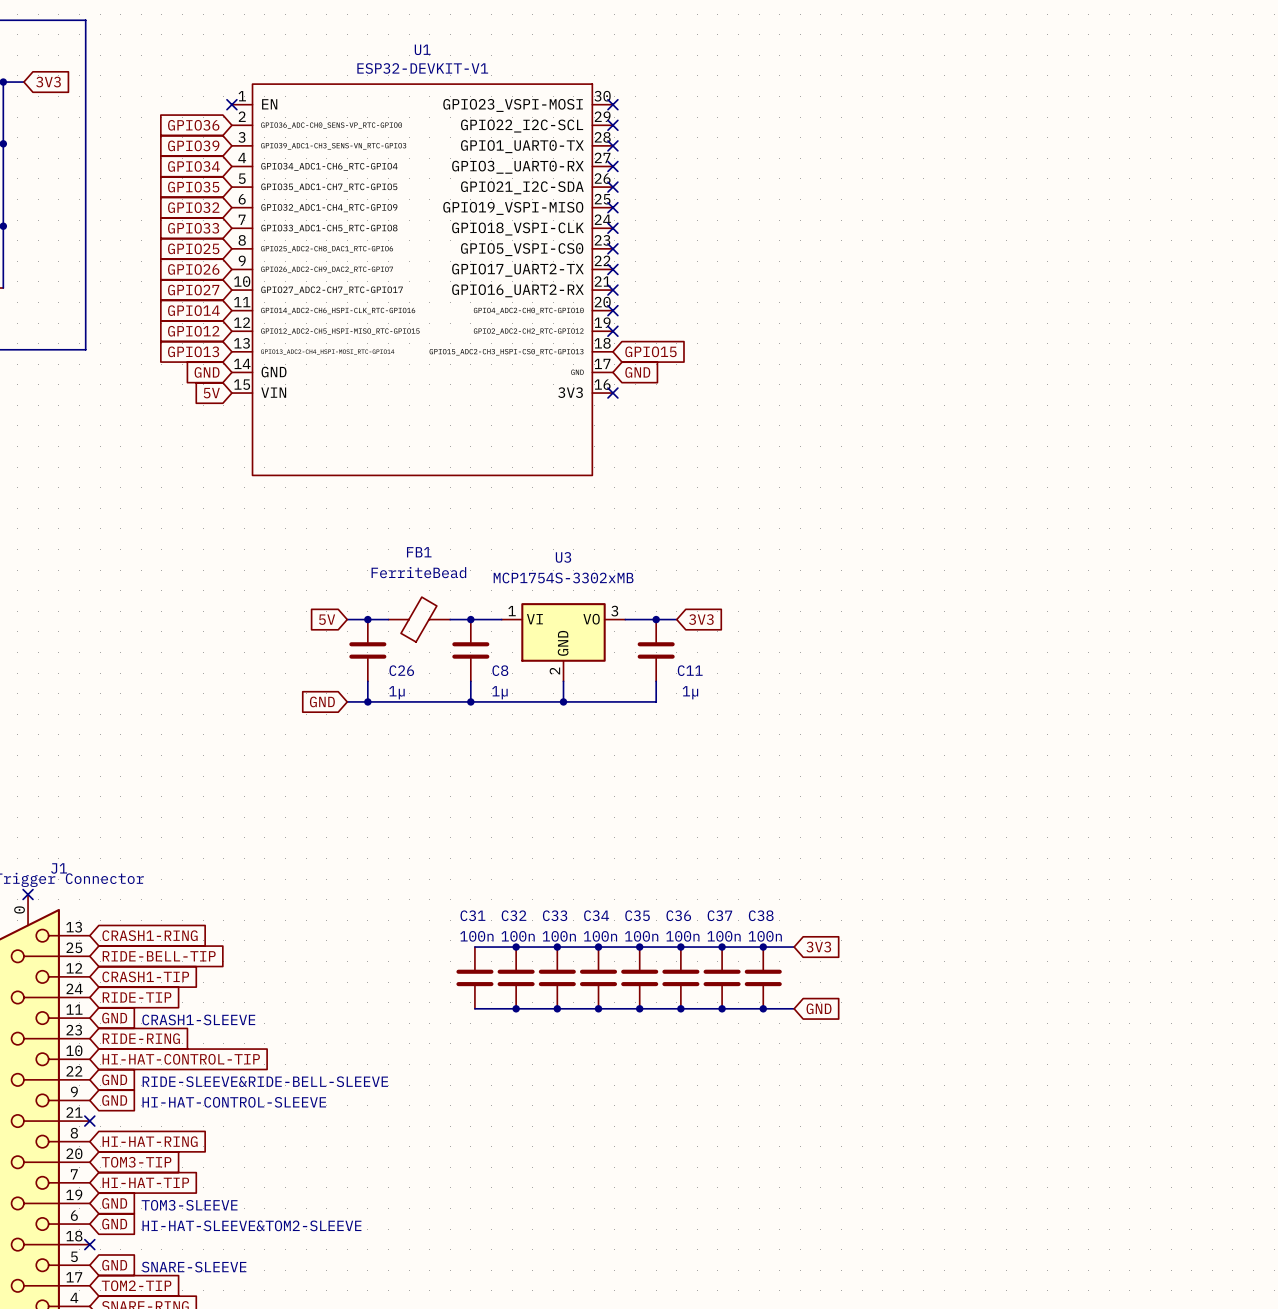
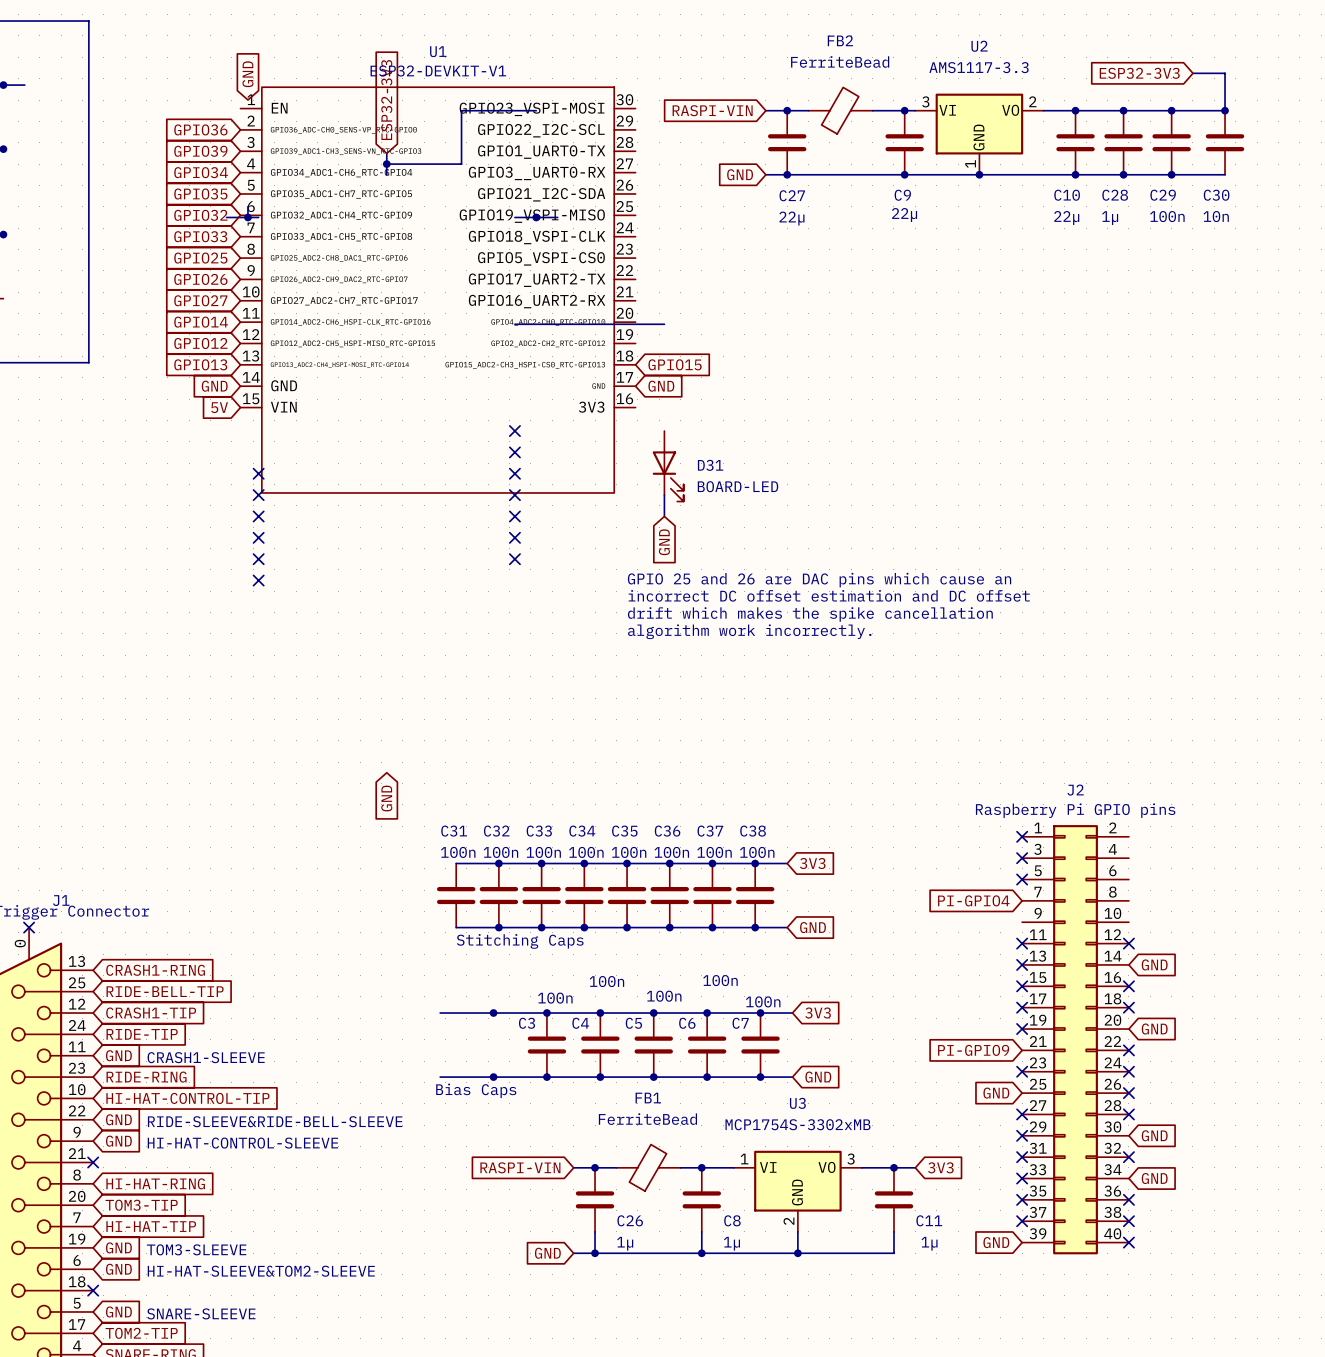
global label: none -> ESP32-3V3 (1139, 73)
wire: none -> (1192, 73) (1225, 73) (1225, 110) (1043, 110)
global label: none -> GND (247, 74)
wire: (3, 82) (3, 287) -> none
global label: 3V3 (48, 82) -> none
global label: none -> ESP32-3V3 (386, 100)
no-connect mark: (231, 104) -> none
no-connect mark: (612, 104) -> none
wire: none -> (536, 110) (461, 110) (461, 164) (386, 164)
global label: none -> RASPI-VIN (712, 110)
wire: none -> (765, 110) (808, 110)
junction: none -> (787, 110)
FB2: none -> FerriteBead (840, 110)
wire: none -> (872, 110) (915, 110)
junction: none -> (904, 110)
junction: none -> (1075, 110)
junction: none -> (1123, 110)
junction: none -> (1171, 110)
junction: none -> (1225, 110)
no-connect mark: (612, 125) -> none
U2: none -> AMS1117-3.3 (979, 134)
C27: none -> 22µ (787, 142)
C9: none -> 22µ (904, 142)
C10: none -> 22µ (1075, 142)
C28: none -> 1µ (1123, 142)
C29: none -> 100n (1171, 142)
C30: none -> 10n (1225, 142)
no-connect mark: (612, 145) -> none
wire: none -> (386, 153) (386, 174)
junction: none -> (386, 164)
no-connect mark: (612, 166) -> none
global label: none -> GND (740, 174)
wire: none -> (765, 174) (1225, 174)
junction: none -> (787, 174)
junction: none -> (904, 174)
junction: none -> (979, 174)
junction: none -> (1075, 174)
junction: none -> (1123, 174)
junction: none -> (1171, 174)
no-connect mark: (612, 187) -> none
wire: none -> (247, 206) (247, 217)
no-connect mark: (612, 207) -> none
wire: none -> (226, 217) (258, 217)
junction: none -> (247, 217)
wire: none -> (514, 217) (557, 217)
junction: none -> (536, 217)
no-connect mark: (612, 228) -> none
no-connect mark: (612, 248) -> none
no-connect mark: (612, 269) -> none
no-connect mark: (612, 290) -> none
no-connect mark: (612, 310) -> none
wire: none -> (514, 324) (664, 324)
no-connect mark: (612, 331) -> none
no-connect mark: (612, 393) -> none
no-connect mark: none -> (514, 431)
no-connect mark: none -> (514, 452)
D31: none -> BOARD-LED (668, 466)
no-connect mark: none -> (258, 473)
no-connect mark: none -> (514, 473)
no-connect mark: none -> (258, 495)
no-connect mark: none -> (514, 495)
wire: none -> (664, 495) (664, 516)
no-connect mark: none -> (258, 516)
no-connect mark: none -> (514, 516)
no-connect mark: none -> (258, 537)
no-connect mark: none -> (514, 537)
global label: none -> GND (664, 542)
no-connect mark: none -> (258, 559)
no-connect mark: none -> (514, 559)
no-connect mark: none -> (258, 580)
text: none -> GPIO 25 and 26 are DAC pins which cause an (819, 580)
text: none -> incorrect DC offset estimation and DC offset (829, 595)
text: none -> drift which makes the spike cancellation (810, 614)
text: none -> algorithm work incorrectly. (749, 631)
global label: 5V (327, 619) -> none
wire: (347, 619) (388, 619) -> none
junction: (367, 619) -> none
FB1 position: (419, 619) -> (648, 1167)
wire: (450, 619) (501, 619) -> none
junction: (470, 619) -> none
wire: (625, 619) (676, 619) -> none
junction: (656, 619) -> none
global label: 3V3 (701, 619) -> none
U3 position: (563, 642) -> (797, 1191)
C26 position: (367, 650) -> (595, 1199)
C8 position: (470, 650) -> (701, 1199)
C11 position: (656, 650) -> (893, 1199)
wire: (367, 681) (367, 701) -> none
wire: (470, 681) (470, 701) -> none
wire: (563, 681) (563, 701) -> none
wire: (656, 681) (656, 701) (347, 701) -> none
global label rotation: 0° (322, 701) -> 90° counterclockwise (386, 798)
global label position: GND (322, 701) -> GND (386, 798)
junction: (367, 701) -> none
junction: (470, 701) -> none
junction: (563, 701) -> none
no-connect mark: none -> (1022, 836)
no-connect mark: none -> (1022, 858)
junction: none -> (498, 863)
junction: none -> (541, 863)
junction: none -> (584, 863)
junction: none -> (627, 863)
junction: none -> (669, 863)
junction: none -> (712, 863)
junction: none -> (755, 863)
global label: none -> 3V3 (812, 863)
no-connect mark: none -> (1022, 879)
global label: none -> PI-GPIO4 (973, 900)
junction: none -> (498, 927)
junction: none -> (541, 927)
junction: none -> (584, 927)
junction: none -> (627, 927)
junction: none -> (669, 927)
junction: none -> (712, 927)
junction: none -> (755, 927)
global label: none -> GND (812, 927)
text: none -> Stitching Caps (520, 941)
no-connect mark: none -> (1022, 943)
no-connect mark: none -> (1128, 943)
no-connect mark: none -> (1022, 964)
global label: none -> GND (1154, 964)
wire: (474, 947) (794, 947) -> (456, 863) (787, 863)
junction: (516, 947) -> none
junction: (557, 947) -> none
junction: (598, 947) -> none
junction: (639, 947) -> none
junction: (680, 947) -> none
junction: (722, 947) -> none
junction: (763, 947) -> none
global label position: 3V3 (818, 947) -> 3V3 (818, 1013)
no-connect mark: none -> (1022, 986)
no-connect mark: none -> (1128, 986)
no-connect mark: none -> (1022, 1007)
no-connect mark: none -> (1128, 1007)
wire: none -> (440, 1013) (792, 1013)
junction: none -> (493, 1013)
junction: none -> (546, 1013)
junction: none -> (600, 1013)
junction: none -> (653, 1013)
junction: none -> (707, 1013)
junction: none -> (760, 1013)
C31 position: (474, 977) -> (456, 895)
C32 position: (516, 977) -> (498, 895)
C33 position: (557, 977) -> (541, 895)
C34 position: (598, 977) -> (584, 895)
C35 position: (639, 977) -> (627, 895)
C36 position: (680, 977) -> (669, 895)
C37 position: (722, 977) -> (712, 895)
C38 position: (763, 977) -> (755, 895)
no-connect mark: none -> (1022, 1029)
global label: none -> GND (1154, 1029)
J2: none -> Raspberry Pi GPIO pins (1075, 1039)
C3: none -> 100n (546, 1045)
C4: none -> 100n (600, 1045)
C5: none -> 100n (653, 1045)
C6: none -> 100n (707, 1045)
C7: none -> 100n (760, 1045)
wire: (474, 1008) (794, 1008) -> (456, 927) (787, 927)
junction: (516, 1008) -> none
junction: (557, 1008) -> none
junction: (598, 1008) -> none
junction: (639, 1008) -> none
junction: (680, 1008) -> none
junction: (722, 1008) -> none
junction: (763, 1008) -> none
global label position: GND (819, 1008) -> GND (818, 1077)
global label: none -> PI-GPIO9 (973, 1050)
no-connect mark: none -> (1128, 1050)
no-connect mark: none -> (1022, 1071)
no-connect mark: none -> (1128, 1071)
wire: none -> (440, 1077) (792, 1077)
junction: none -> (493, 1077)
junction: none -> (546, 1077)
junction: none -> (600, 1077)
junction: none -> (653, 1077)
junction: none -> (707, 1077)
junction: none -> (760, 1077)
text: none -> Bias Caps (476, 1090)
global label: none -> GND (996, 1093)
no-connect mark: none -> (1128, 1093)
no-connect mark: none -> (1022, 1114)
no-connect mark: none -> (1128, 1114)
no-connect mark: none -> (1022, 1135)
global label: none -> GND (1154, 1135)
no-connect mark: none -> (1022, 1157)
no-connect mark: none -> (1128, 1157)
global label: none -> RASPI-VIN (520, 1167)
wire: none -> (573, 1167) (616, 1167)
junction: none -> (595, 1167)
wire: none -> (680, 1167) (733, 1167)
junction: none -> (701, 1167)
wire: none -> (861, 1167) (915, 1167)
junction: none -> (893, 1167)
global label: none -> 3V3 (940, 1167)
no-connect mark: none -> (1022, 1178)
global label: none -> GND (1154, 1178)
no-connect mark: none -> (1022, 1199)
no-connect mark: none -> (1128, 1199)
no-connect mark: none -> (1022, 1221)
no-connect mark: none -> (1128, 1221)
wire: none -> (595, 1231) (595, 1253)
wire: none -> (701, 1231) (701, 1253)
wire: none -> (797, 1231) (797, 1253)
wire: none -> (893, 1231) (893, 1253) (573, 1253)
global label: none -> GND (996, 1242)
no-connect mark: none -> (1128, 1242)
global label: none -> GND (547, 1253)
junction: none -> (595, 1253)
junction: none -> (701, 1253)
junction: none -> (797, 1253)

